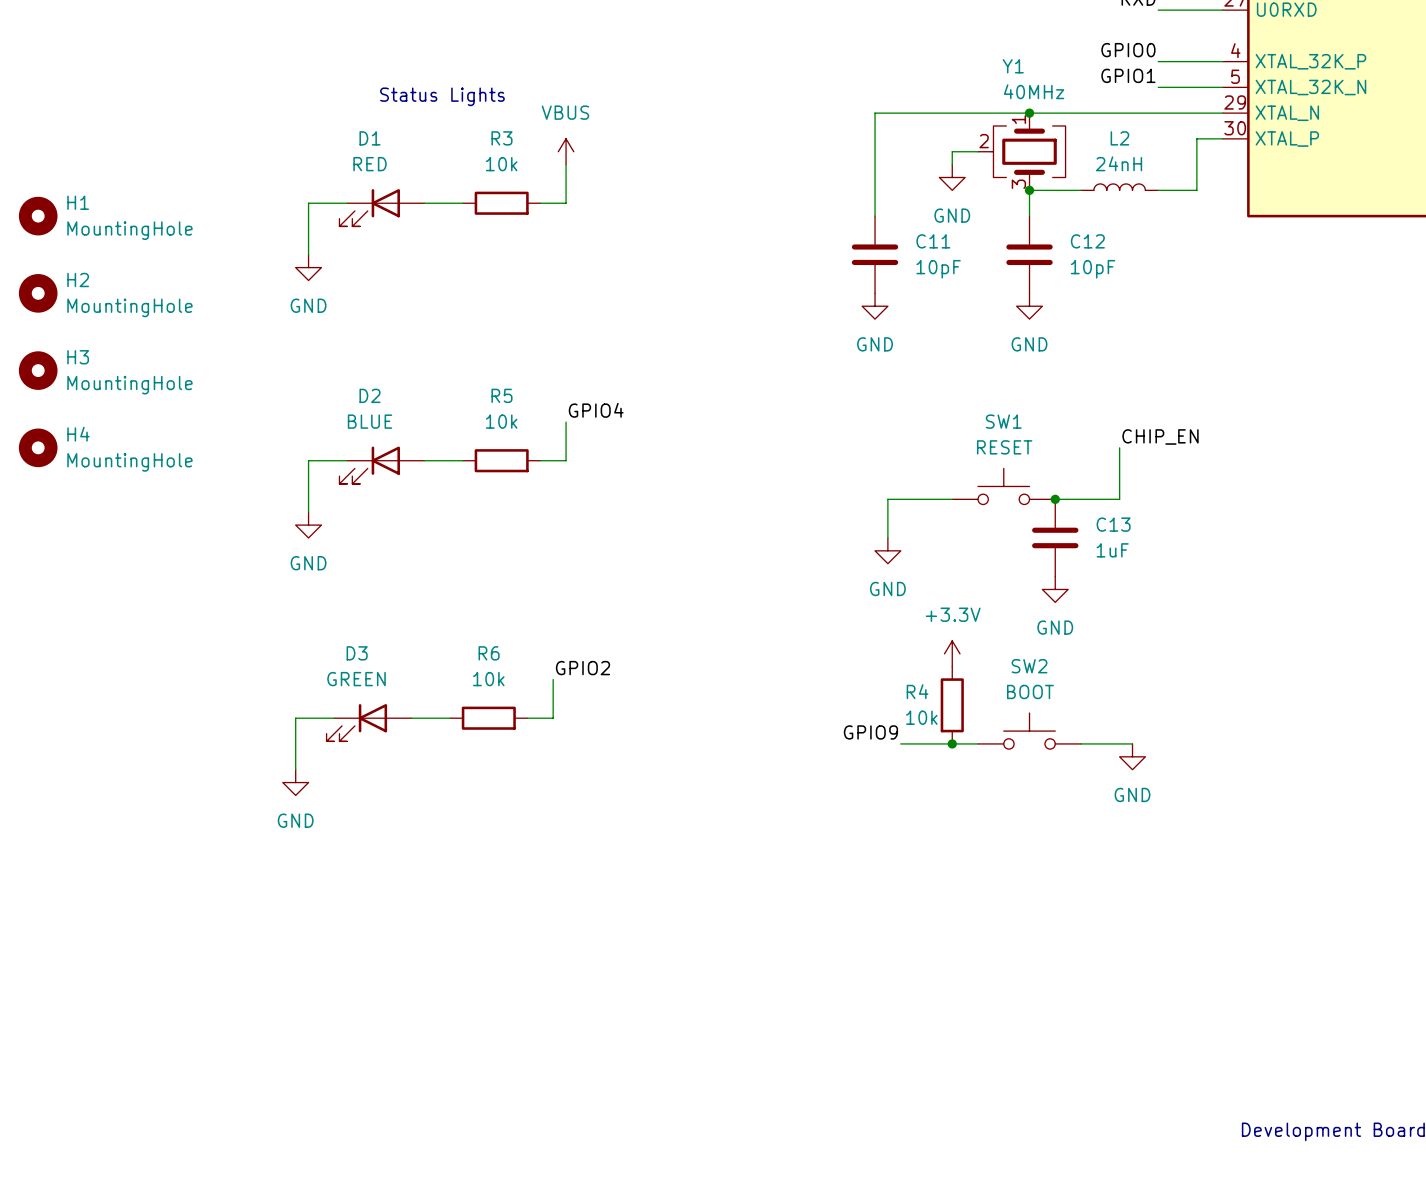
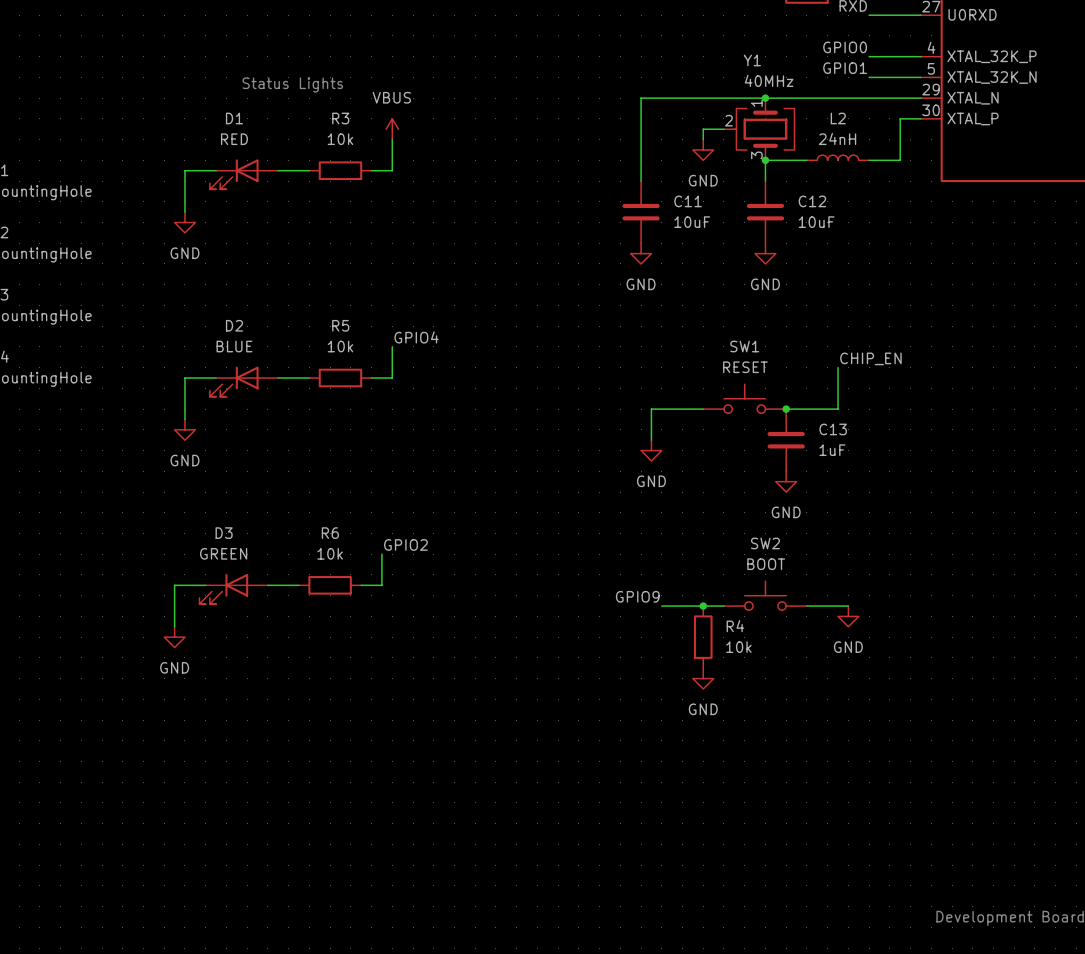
C11 value: 10pF (938, 269) -> 10uF (692, 222)
C12 value: 10pF (1093, 269) -> 10uF (816, 222)
power symbol: +3.3V (952, 653) -> none
R4 name position: R4 (917, 691) -> R4 (735, 626)
R4 position: (952, 705) -> (703, 637)
R4 value position: 10k (921, 717) -> 10k (738, 647)
power symbol: none -> GND (703, 678)

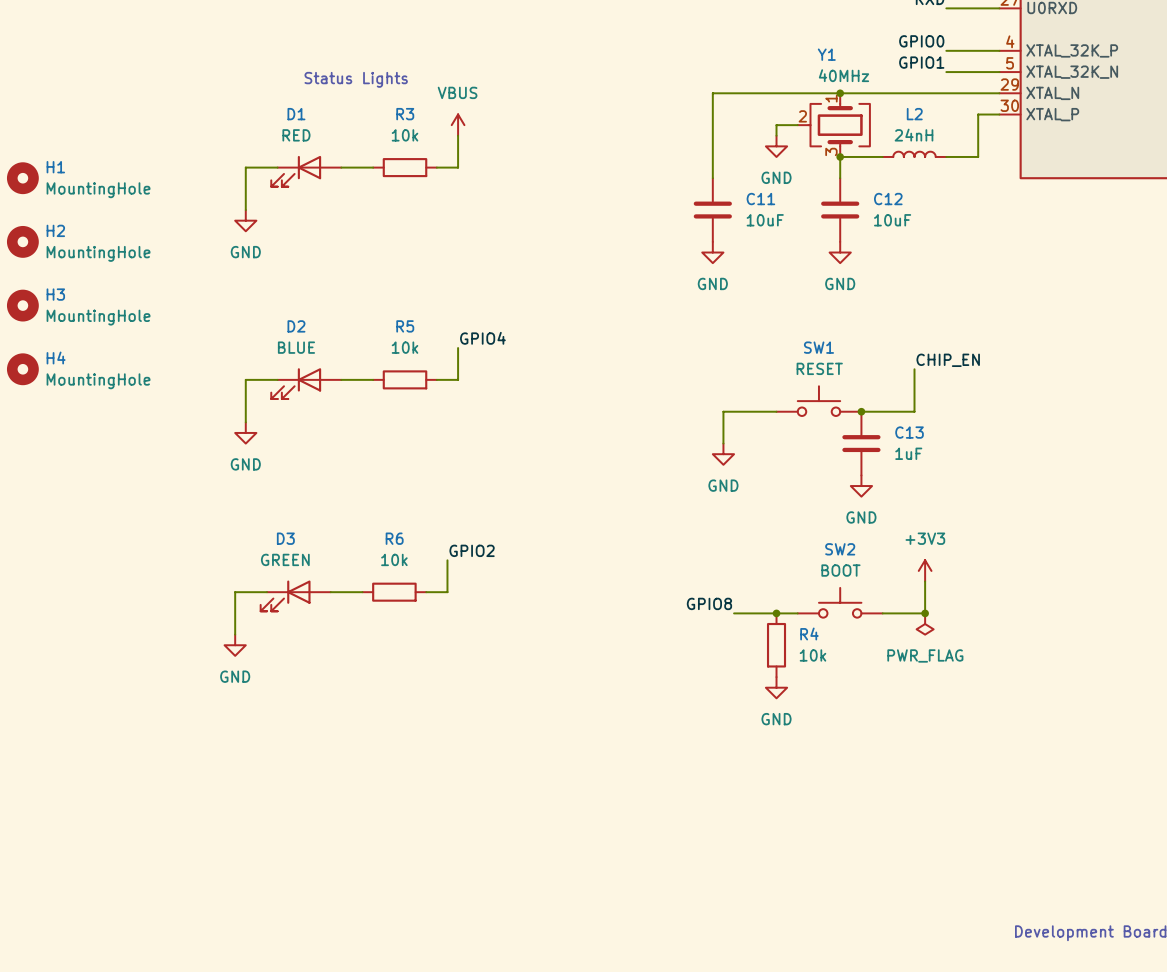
power symbol: none -> +3V3 (925, 570)
wire: none -> (925, 581) (925, 613)
label: GPIO9 (637, 596) -> GPIO8 (709, 603)
junction: none -> (925, 613)
power symbol: GND (848, 616) -> PWR_FLAG (925, 624)

